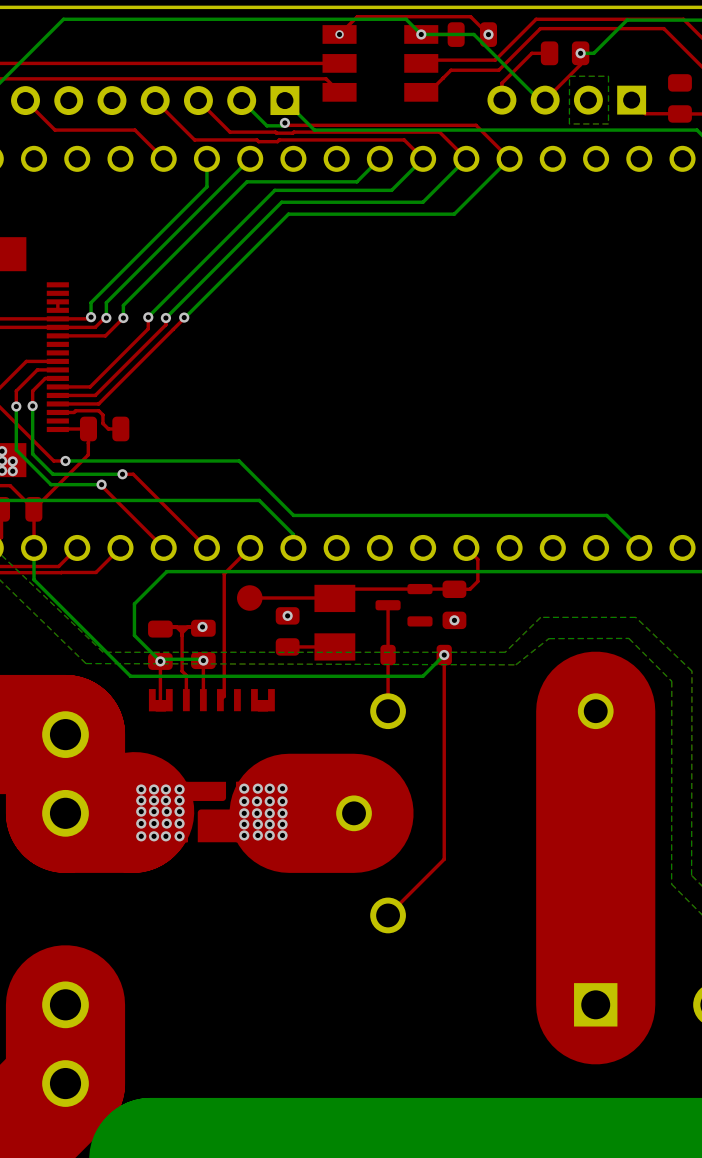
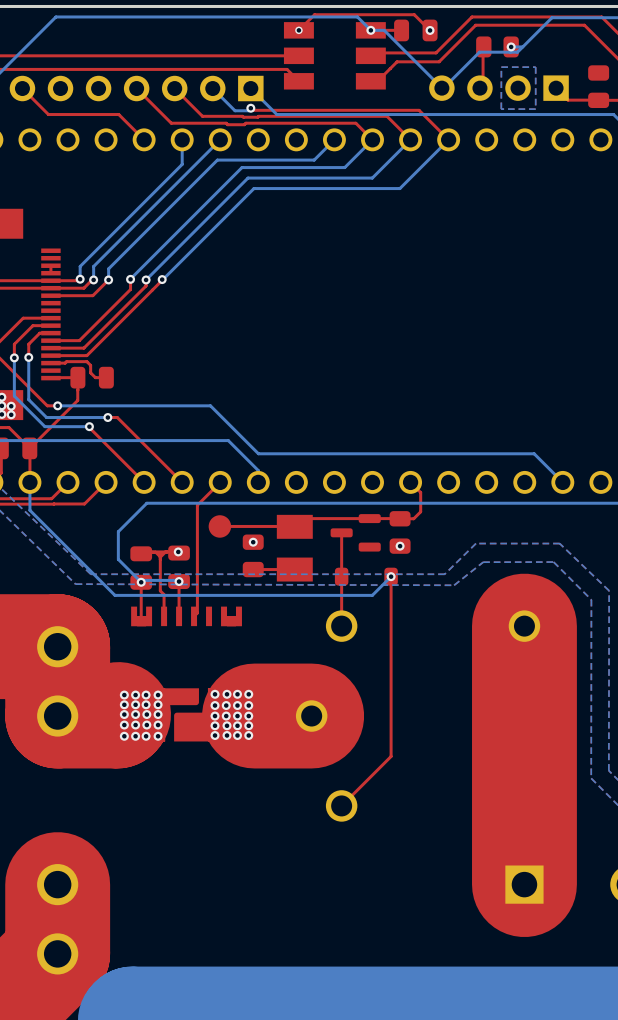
bottom track: (436, 34) (473, 34) (539, 100) (545, 100) -> (384, 30) (442, 88) (479, 52) (517, 52) (522, 46)
top track: (549, 53) (531, 53) (501, 83) (501, 100) -> none
top track: (580, 53) (580, 64) (545, 100) -> none
top track: none -> (483, 52) (483, 86) (480, 88)

